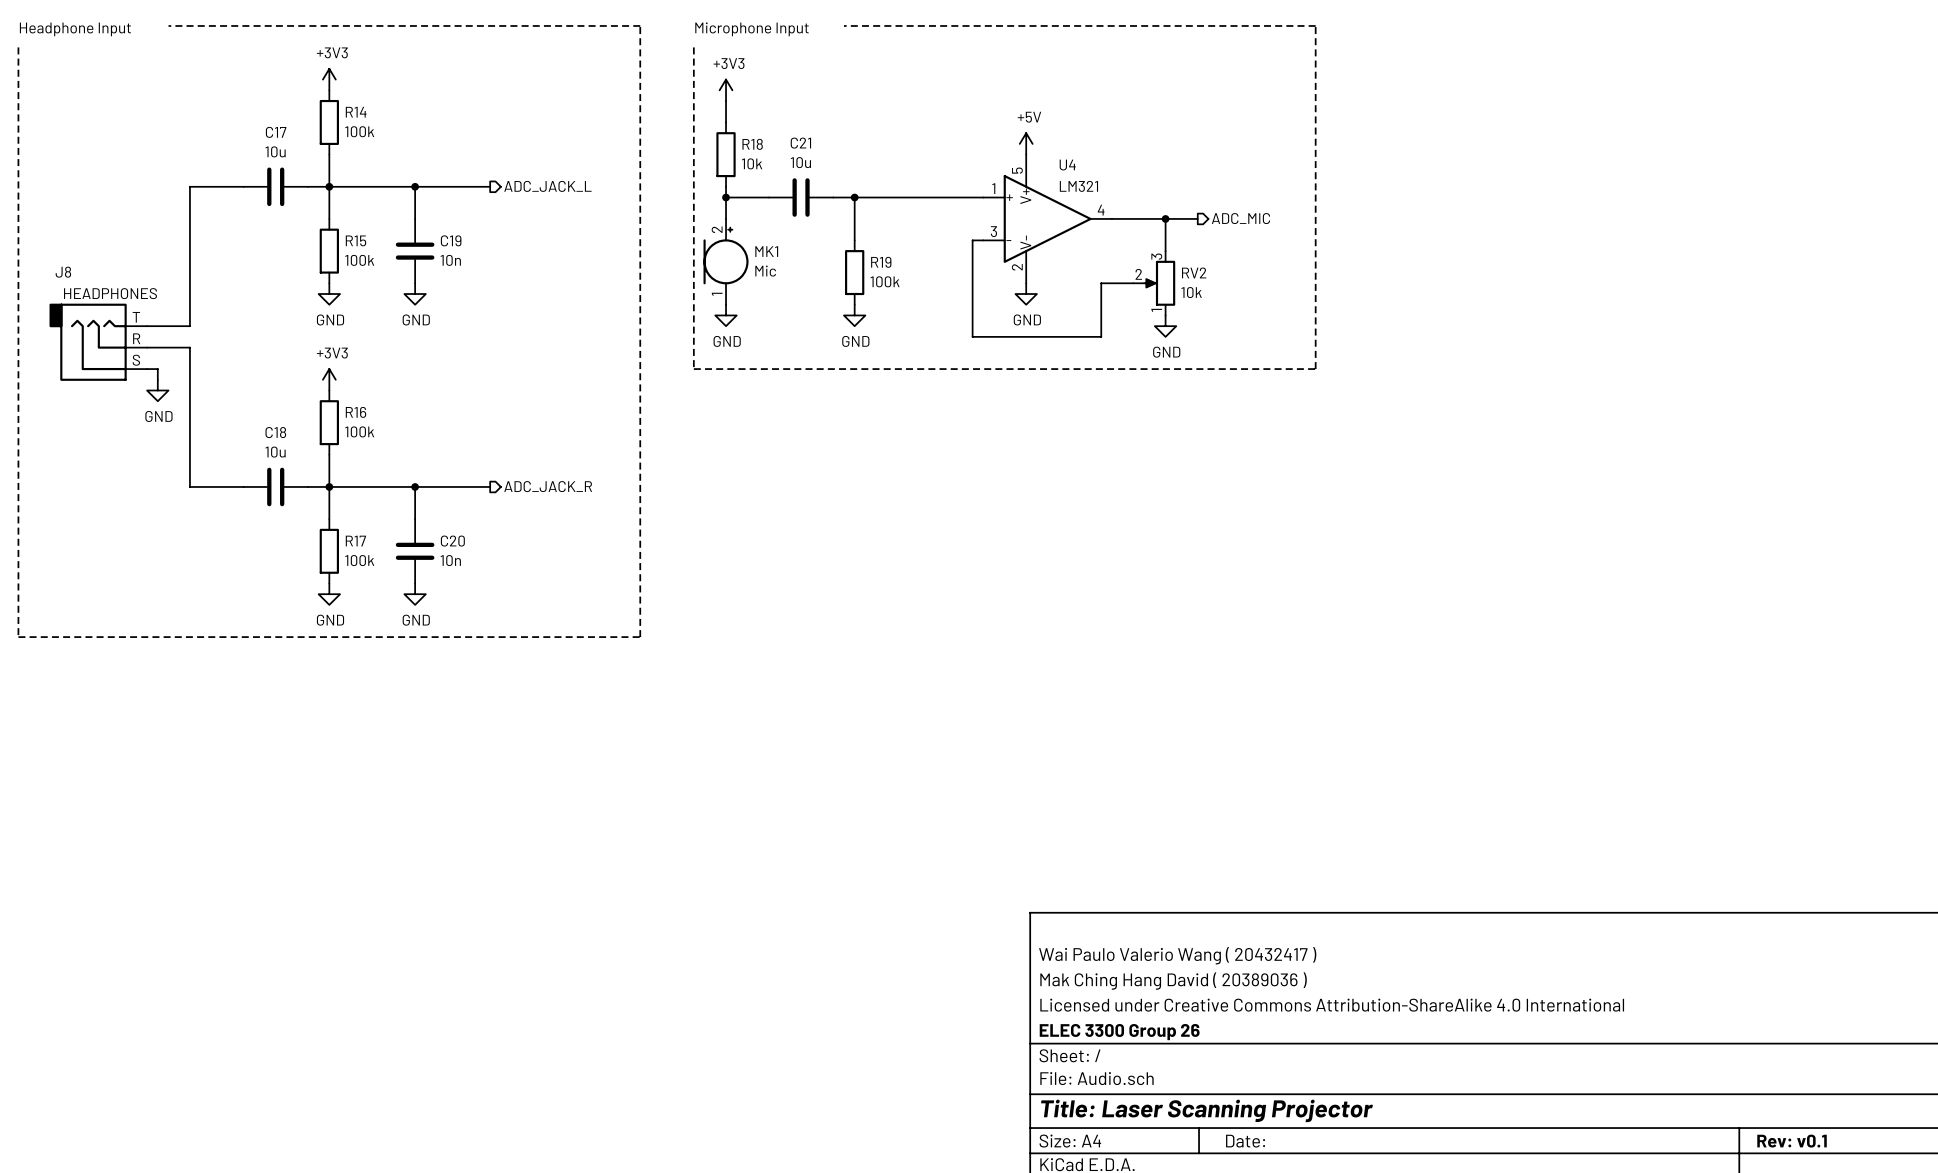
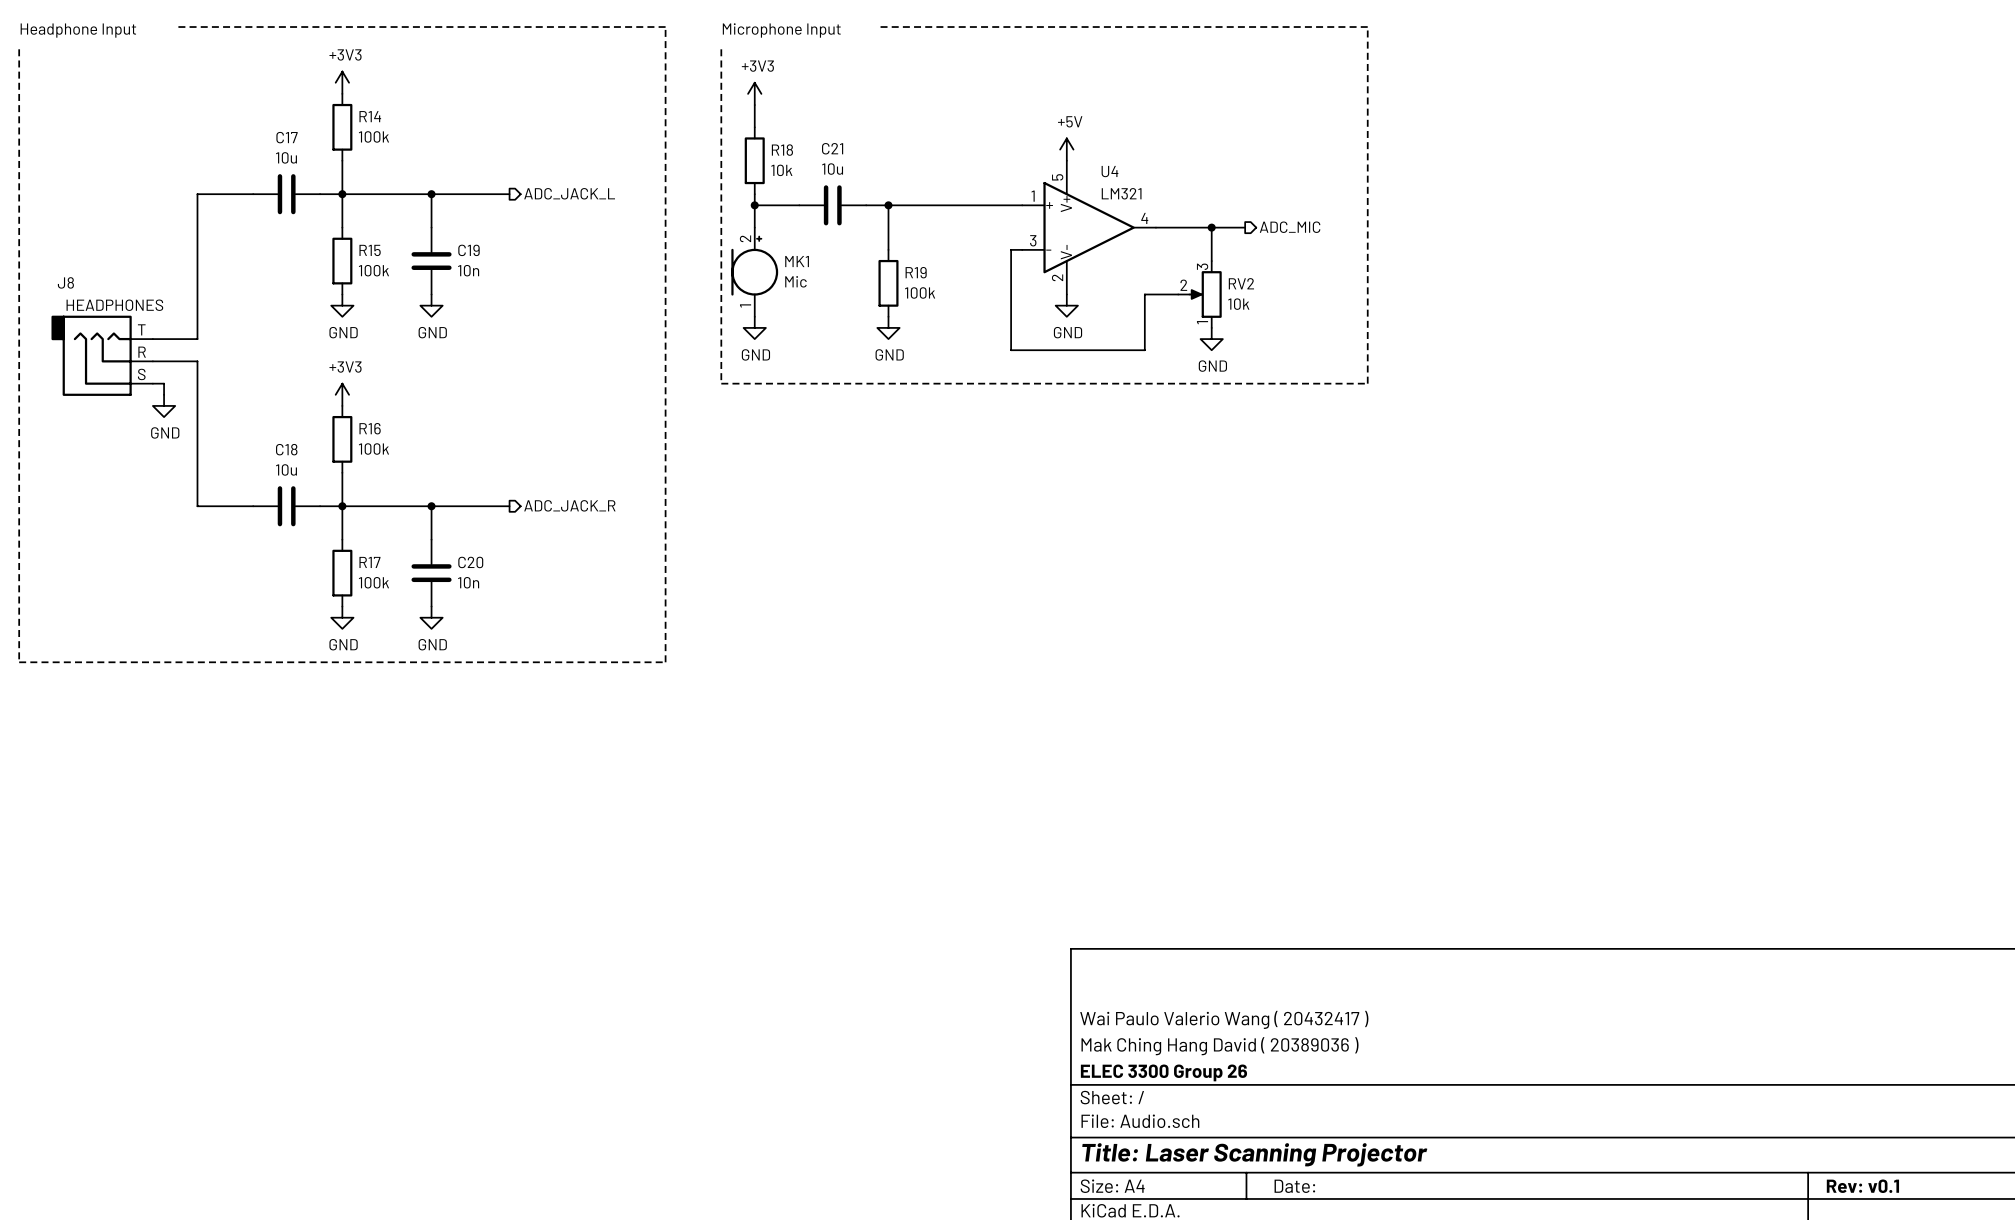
title block: Wai Paulo Valerio Wang ( 20432417 ) (1177, 955) -> none
title block: Mak Ching Hang David ( 20389036 ) (1173, 981) -> Wai Paulo Valerio Wang ( 20432417 ) (1224, 1019)
title block: Licensed under Creative Commons Attribution-ShareAlike 4.0 International (1332, 1005) -> Mak Ching Hang David ( 20389036 ) (1220, 1046)

